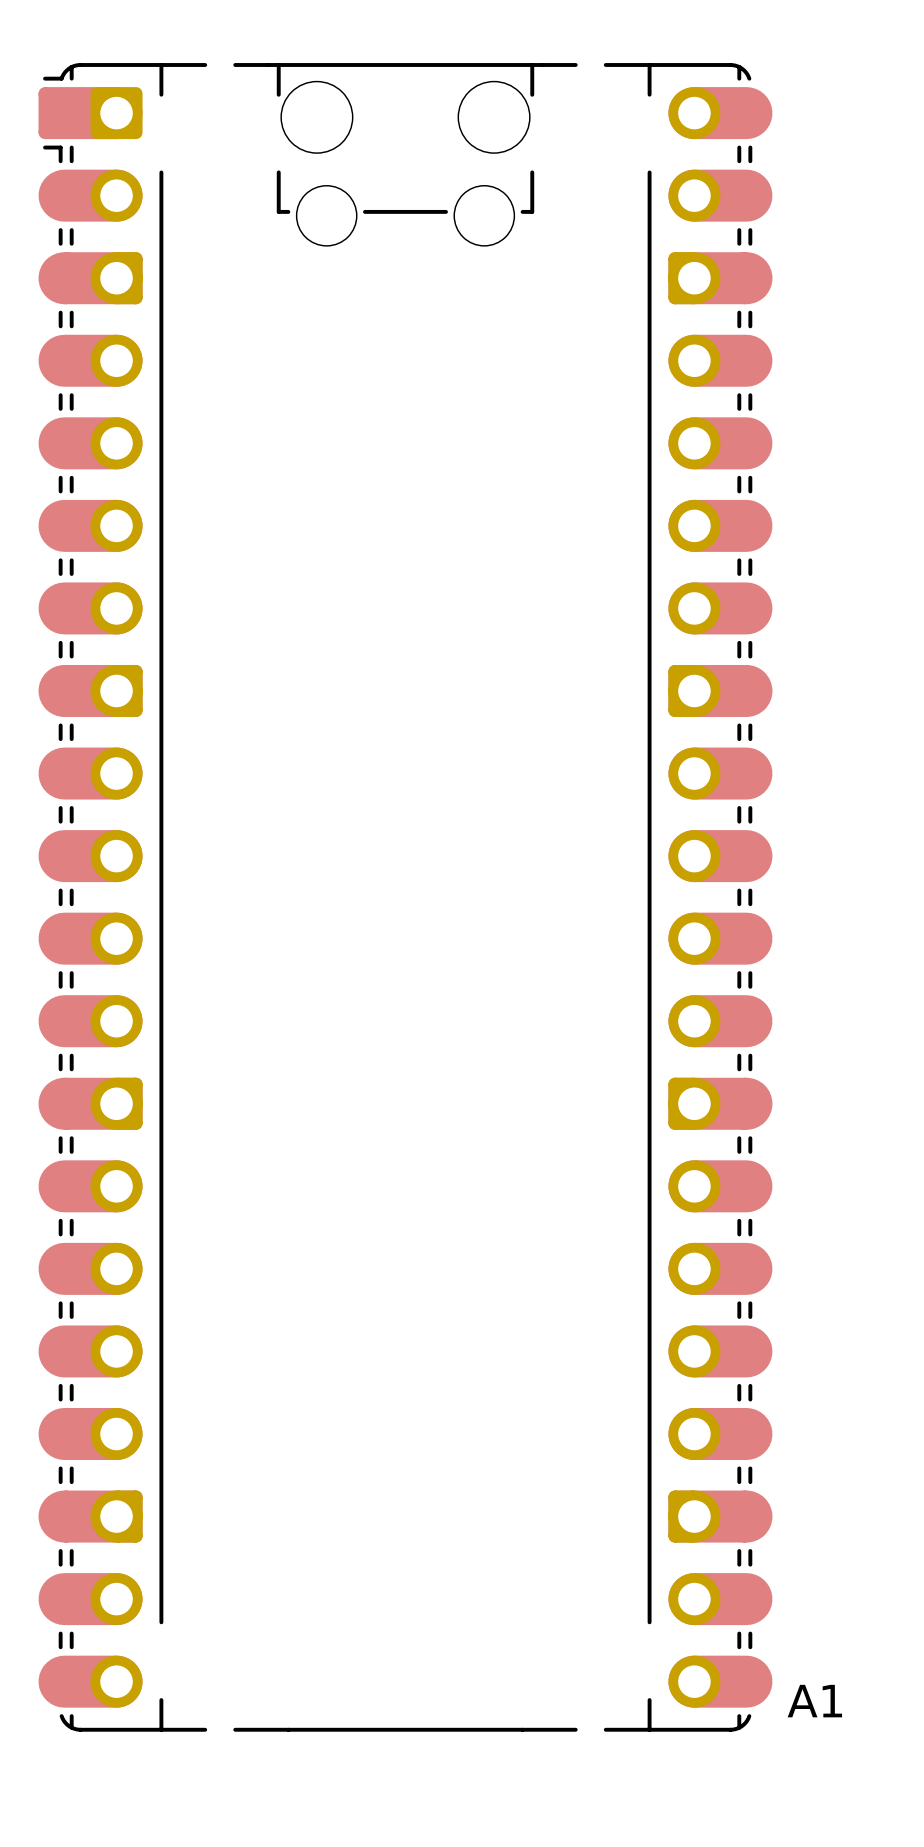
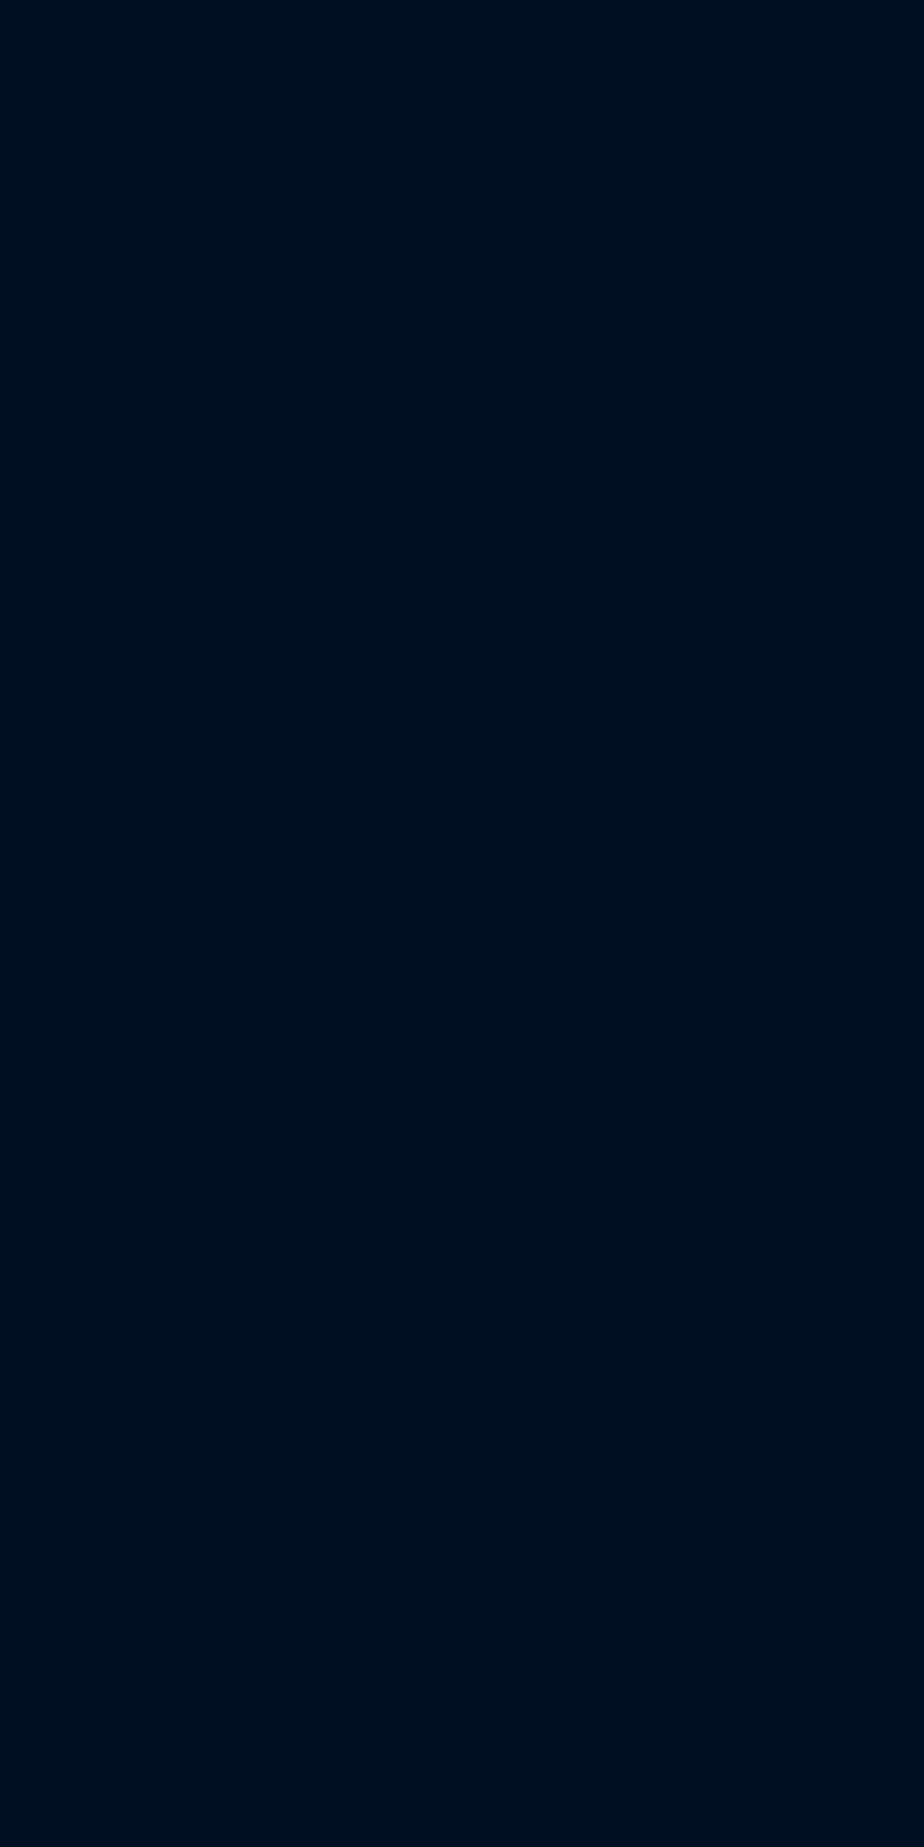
A1: (405, 897) -> none

